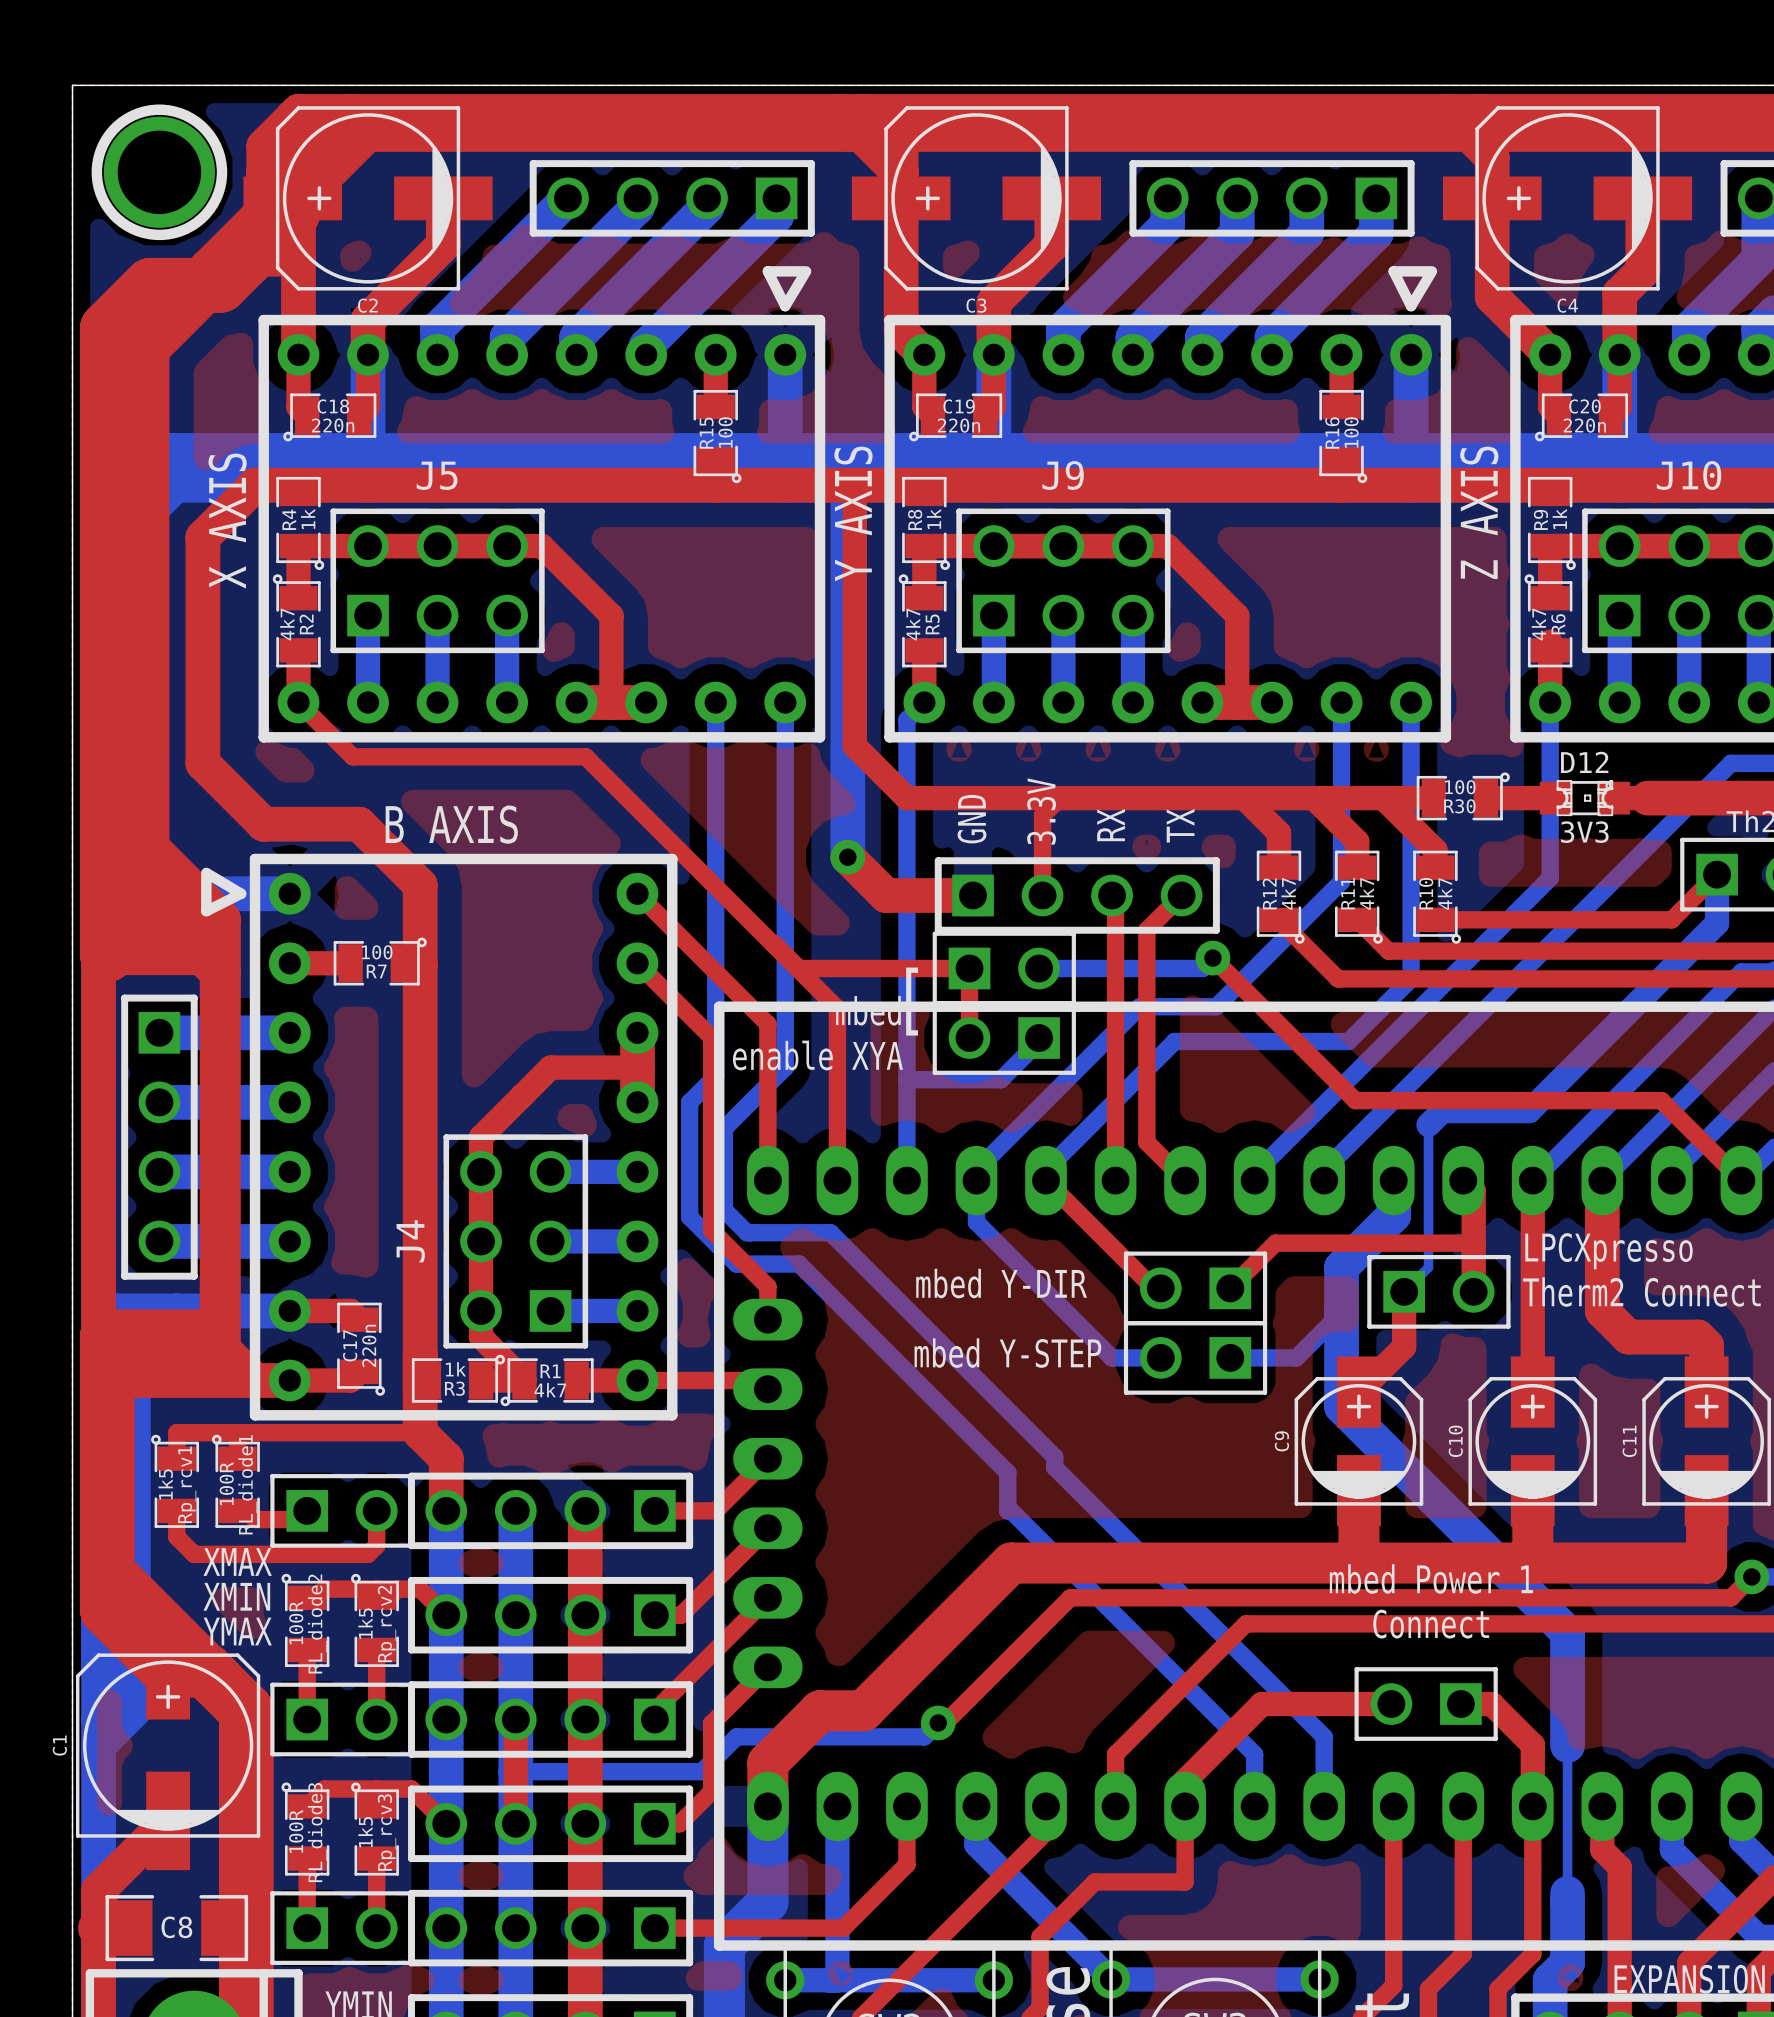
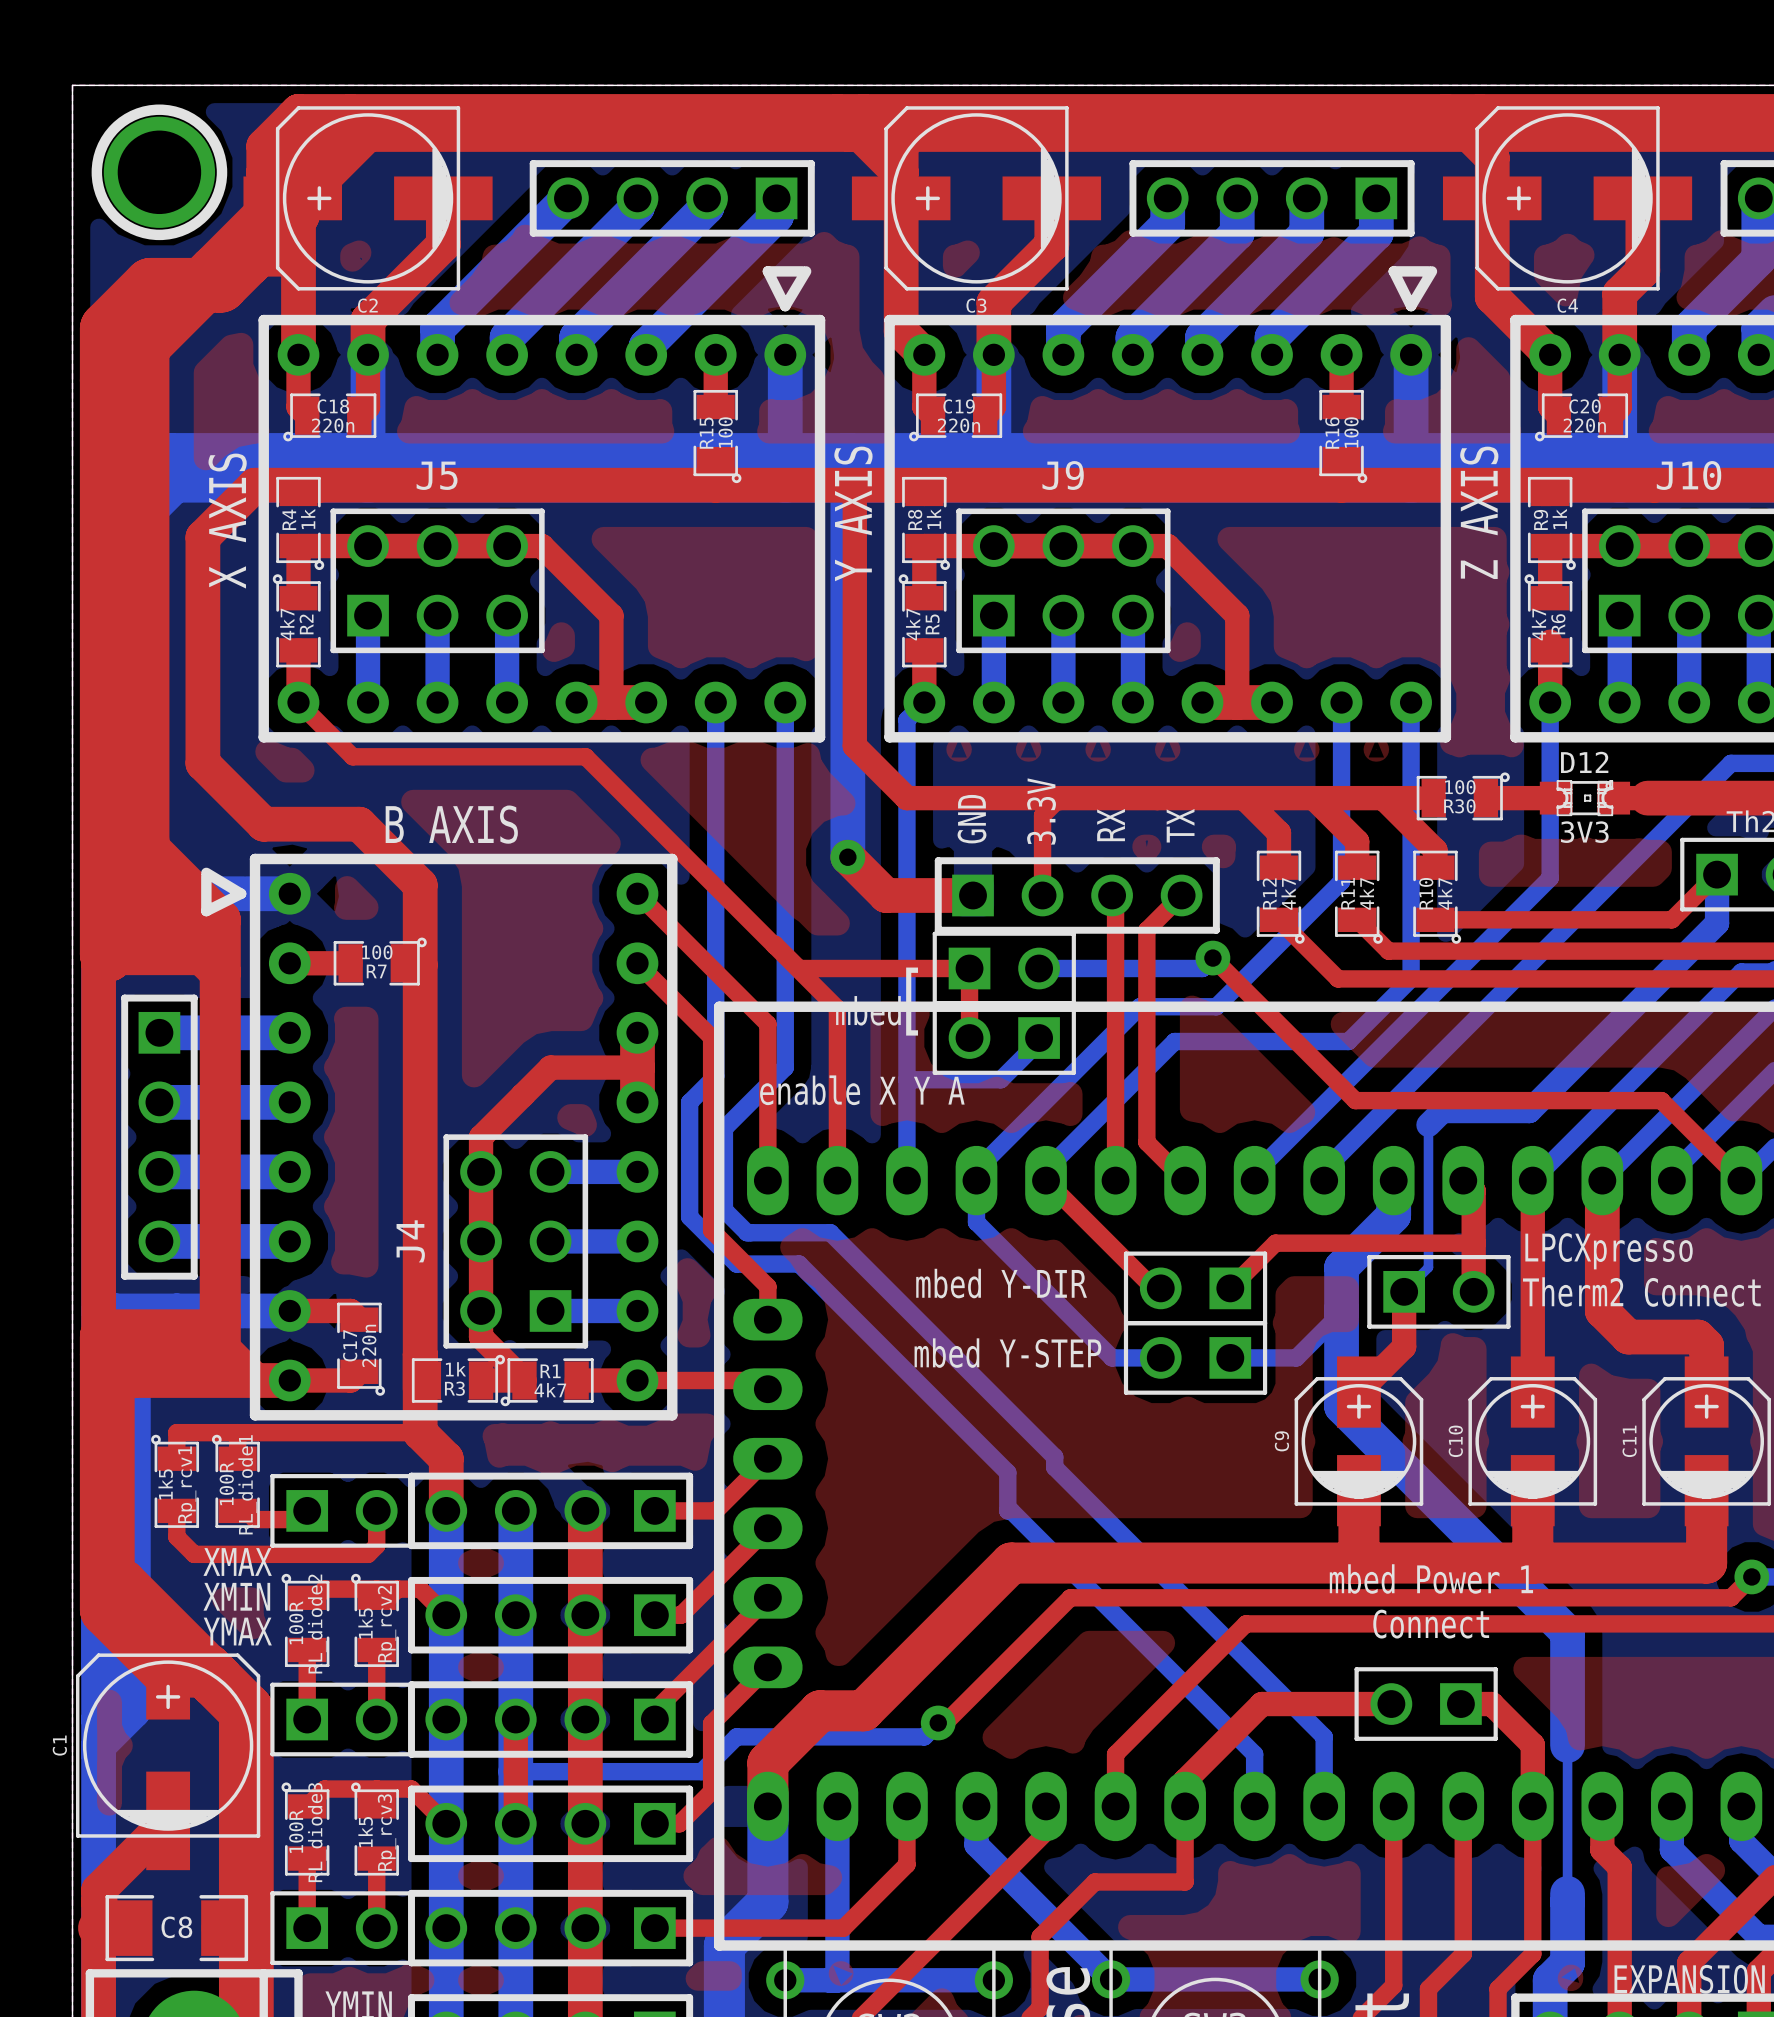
text: enable XYA (817, 1055) -> enable X Y A (862, 1090)

